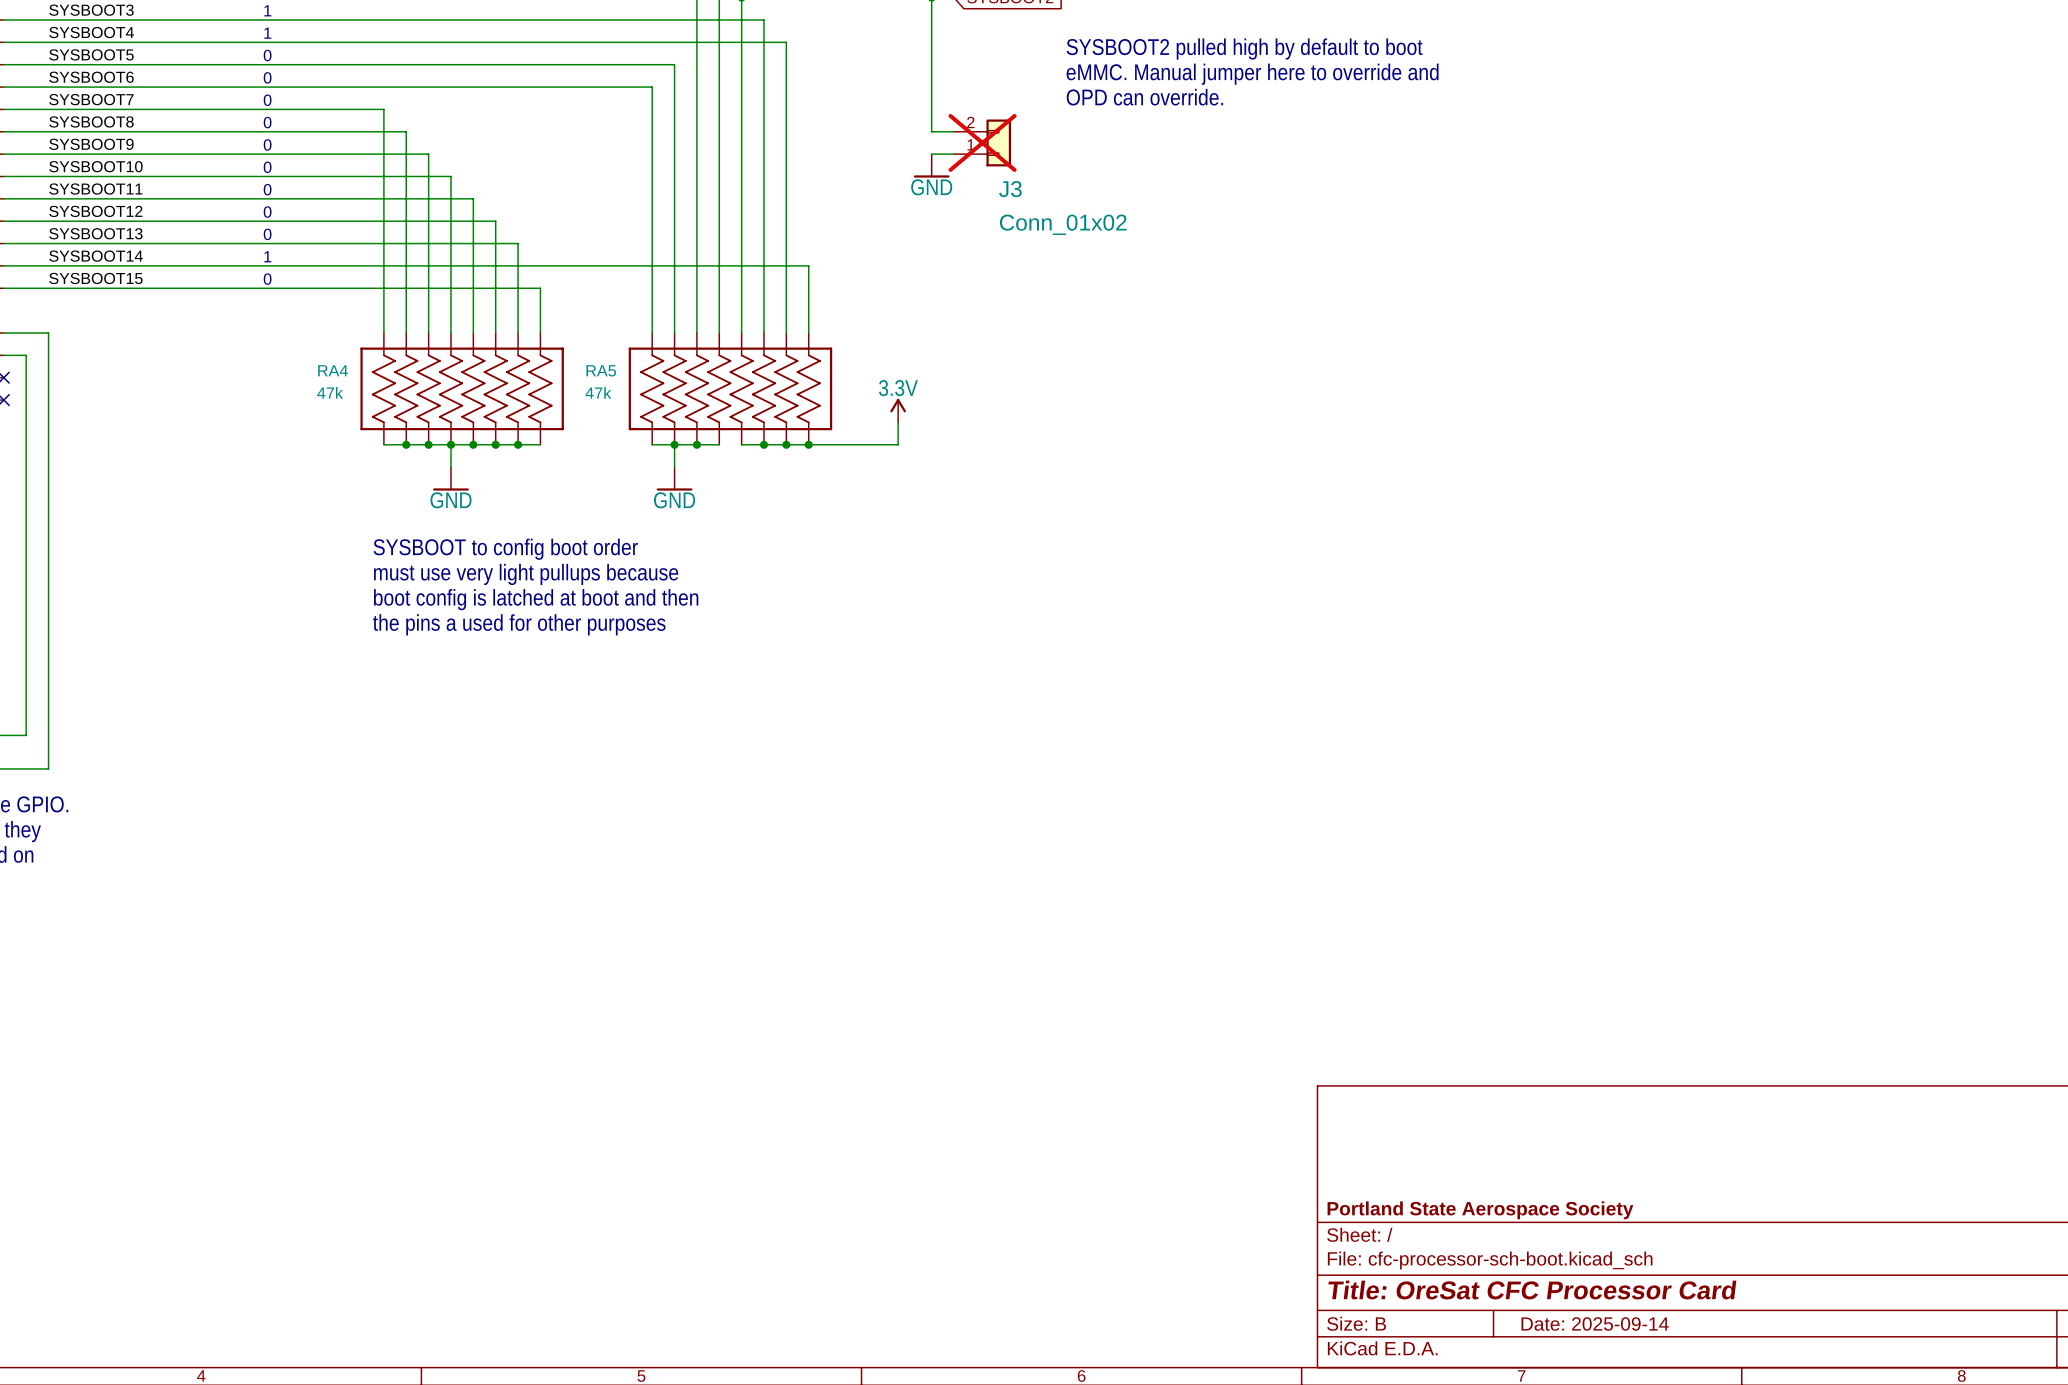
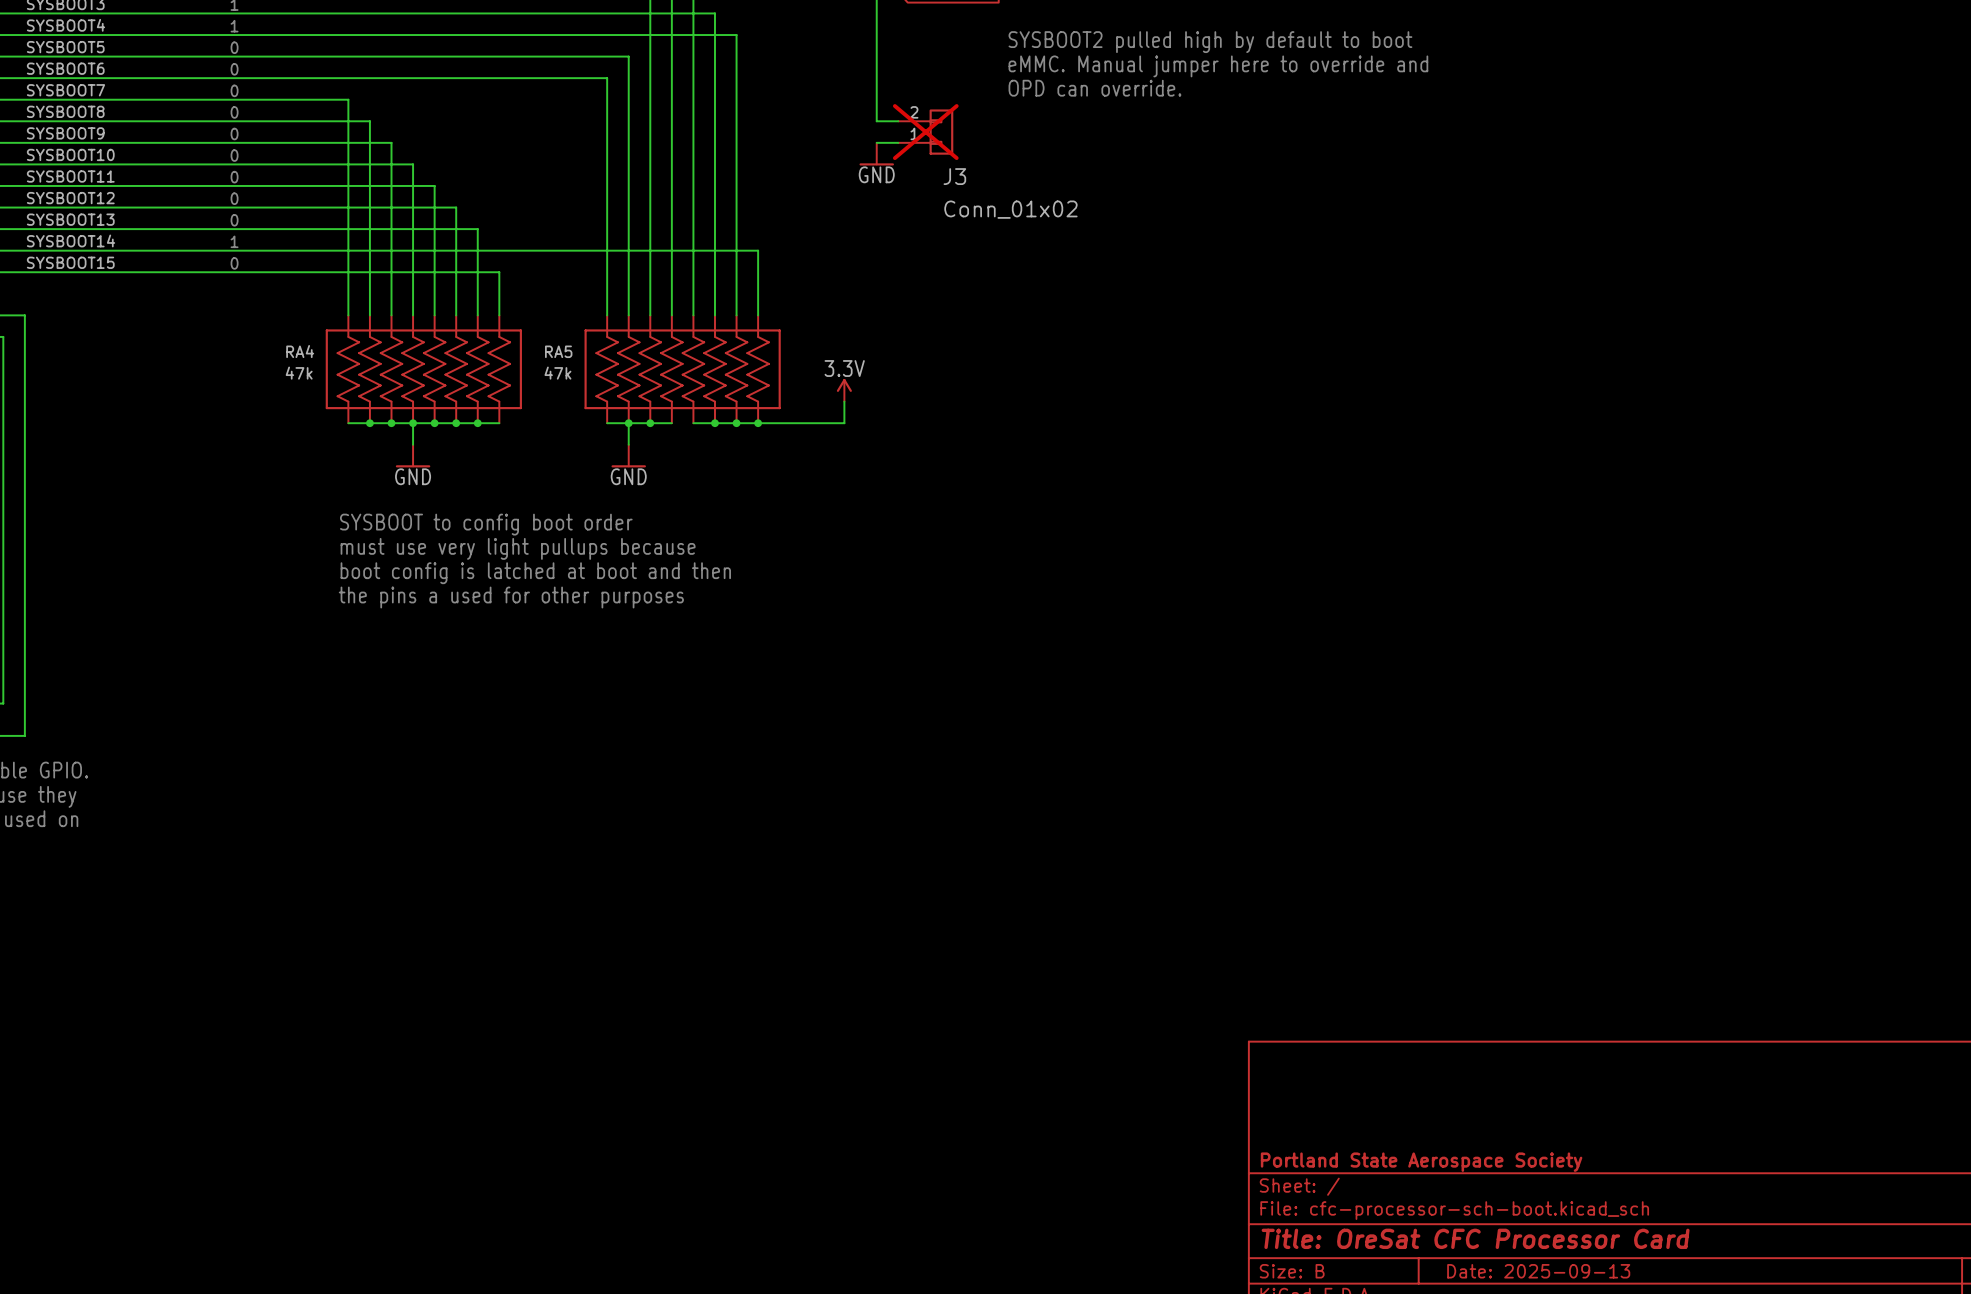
title block: Date: 2025-09-14 (1595, 1323) -> Date: 2025-09-13 (1538, 1271)

